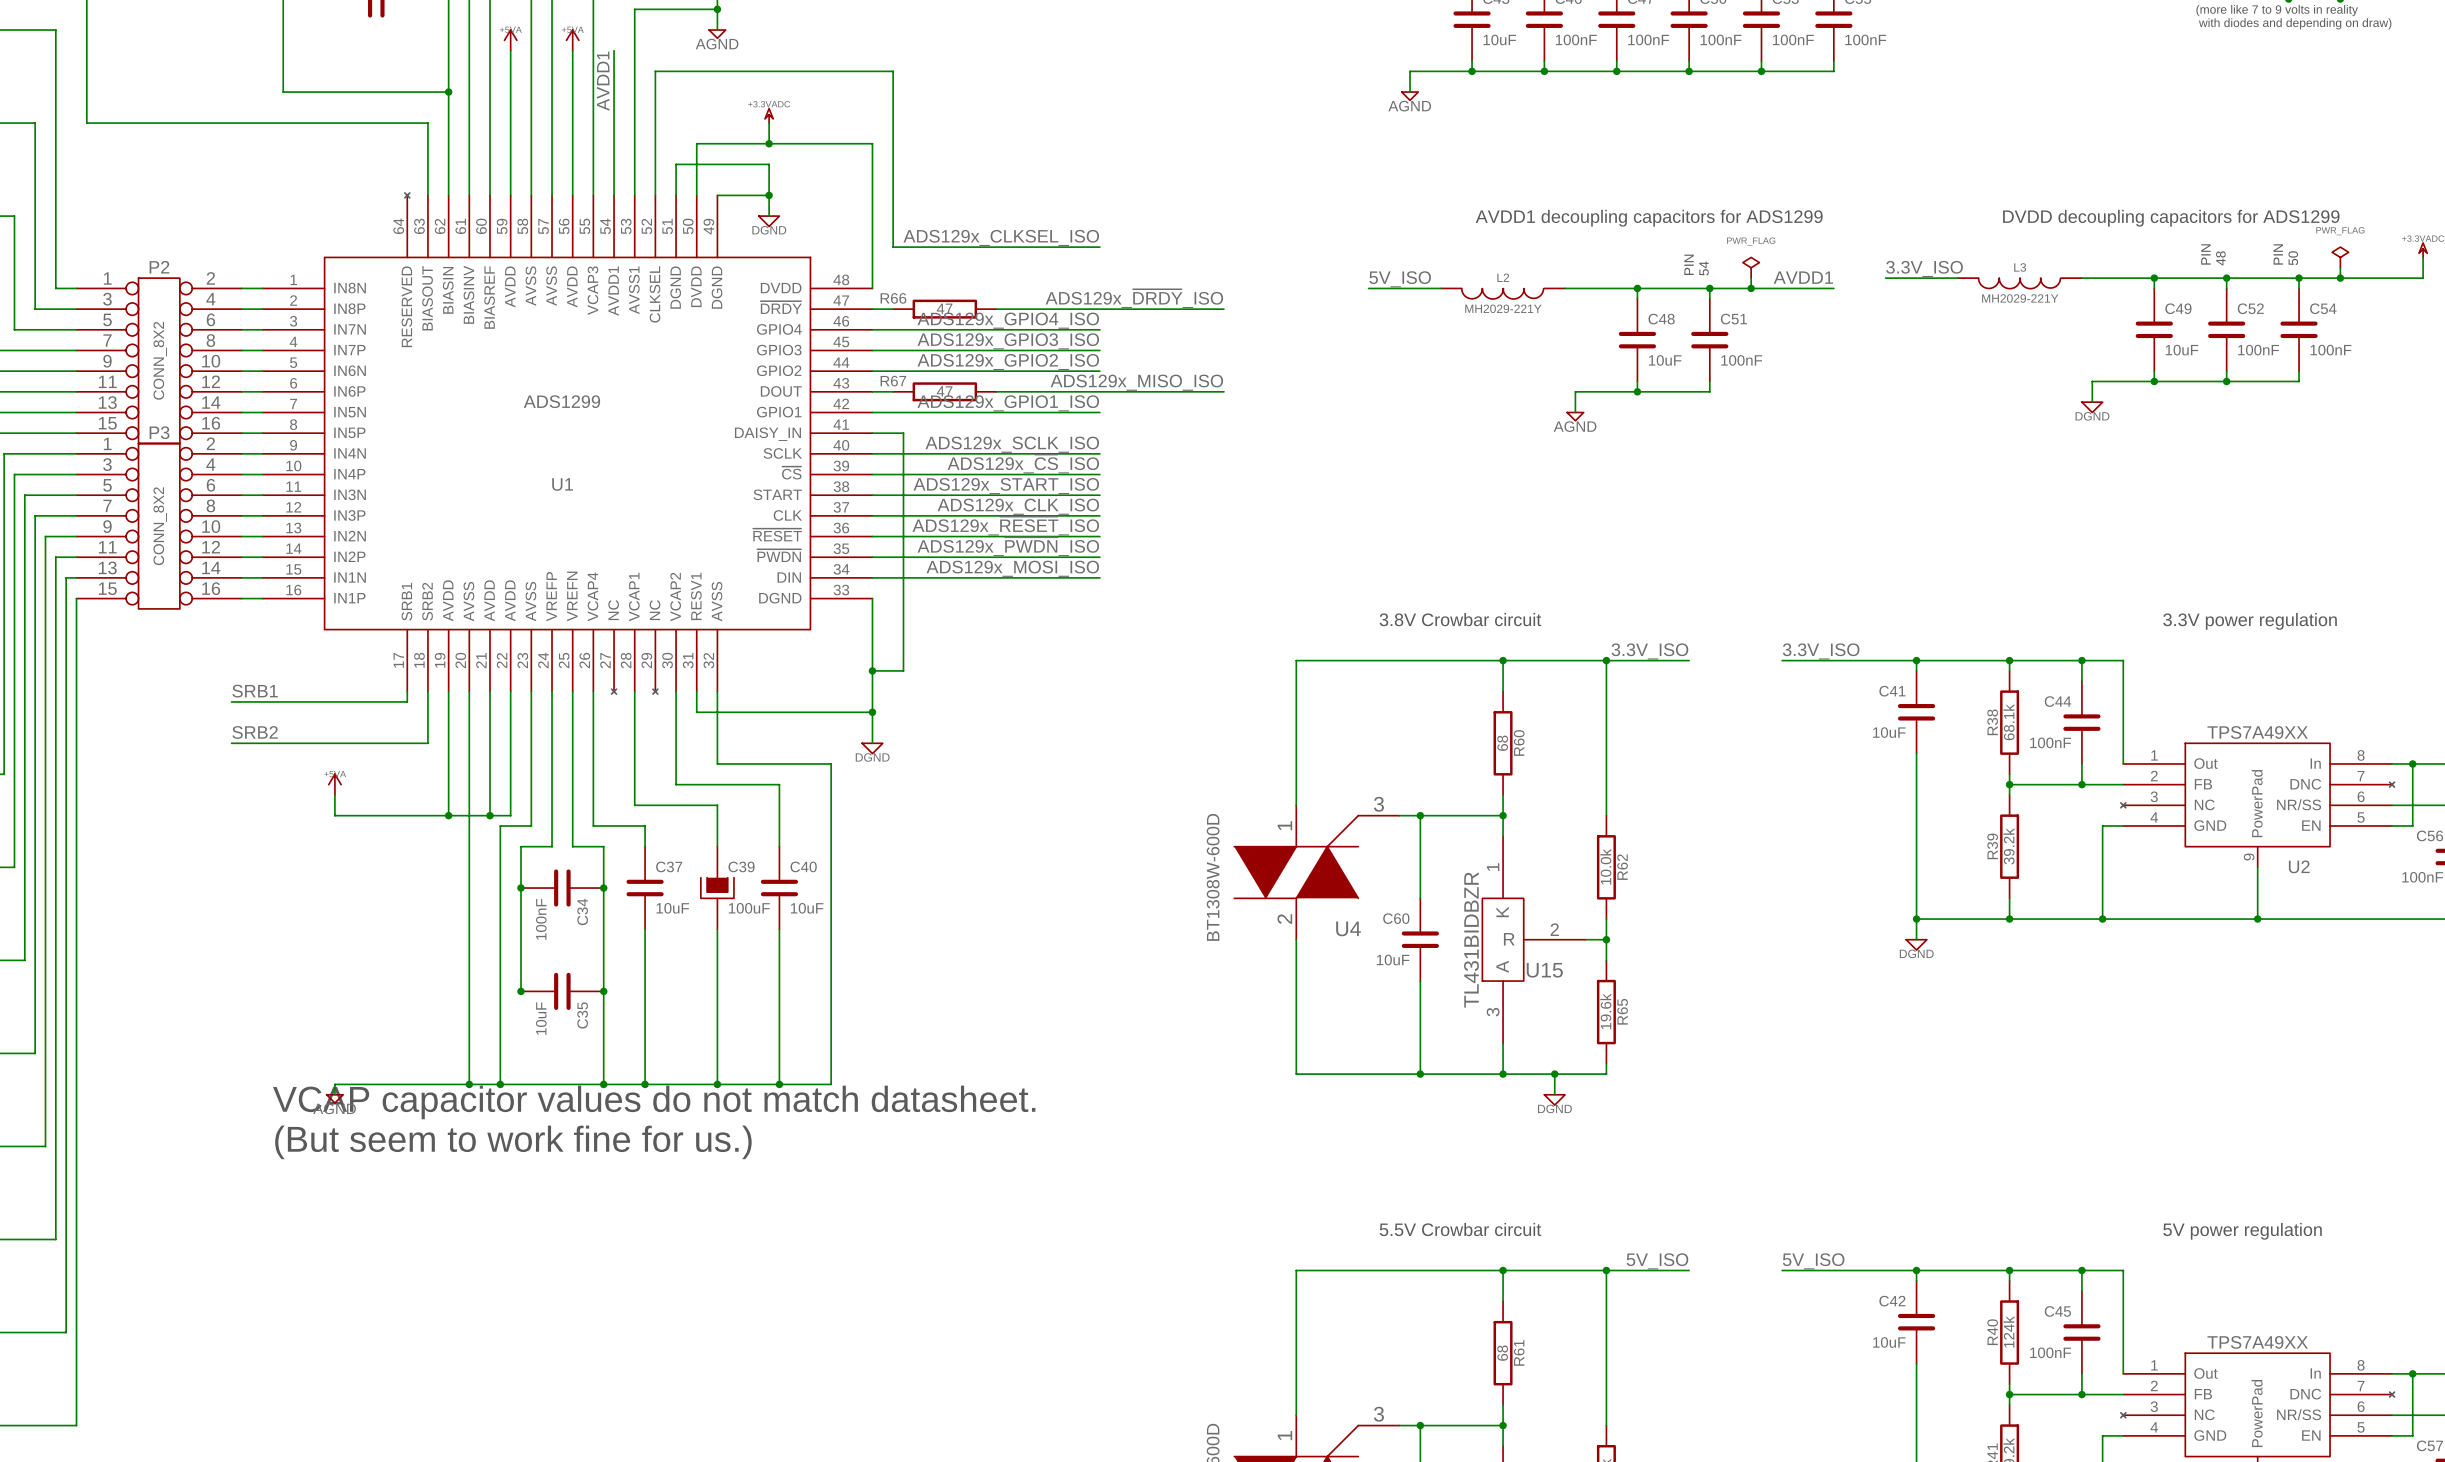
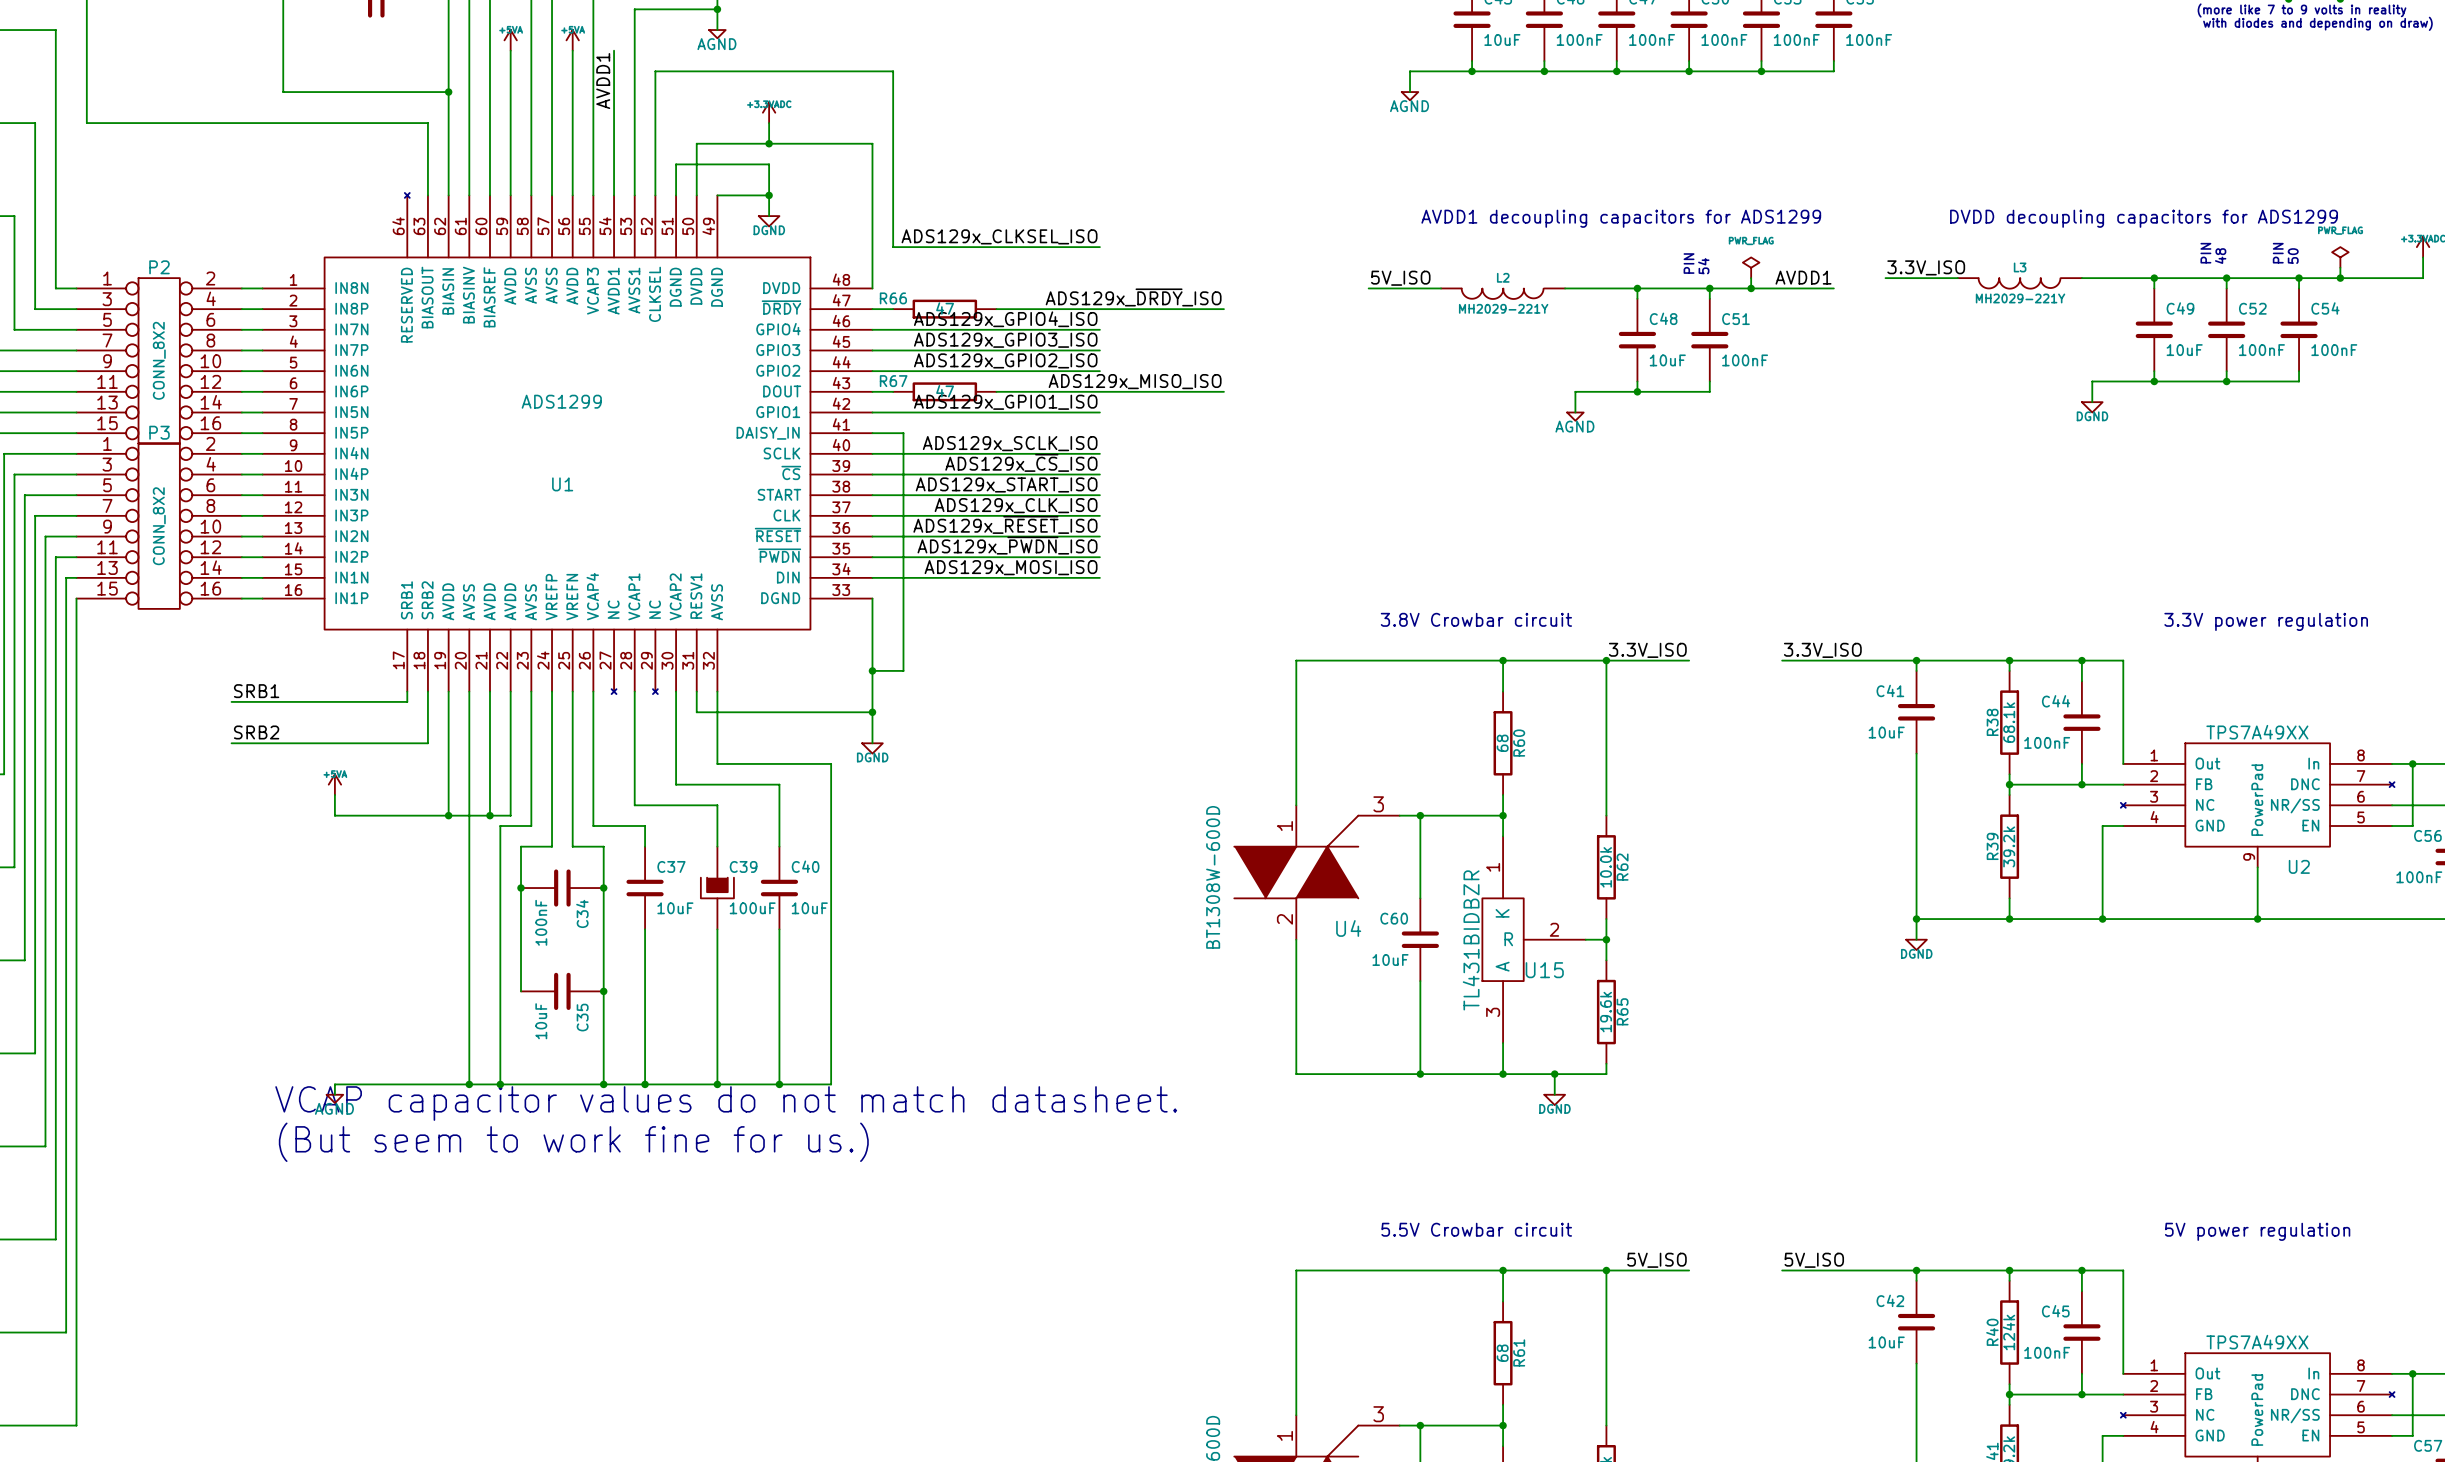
power symbol shape: [764, 108, 774, 124] -> [762, 102, 776, 124]
power symbol shape: [2418, 242, 2428, 258] -> [2416, 236, 2430, 258]
junction: (521, 991) -> none

